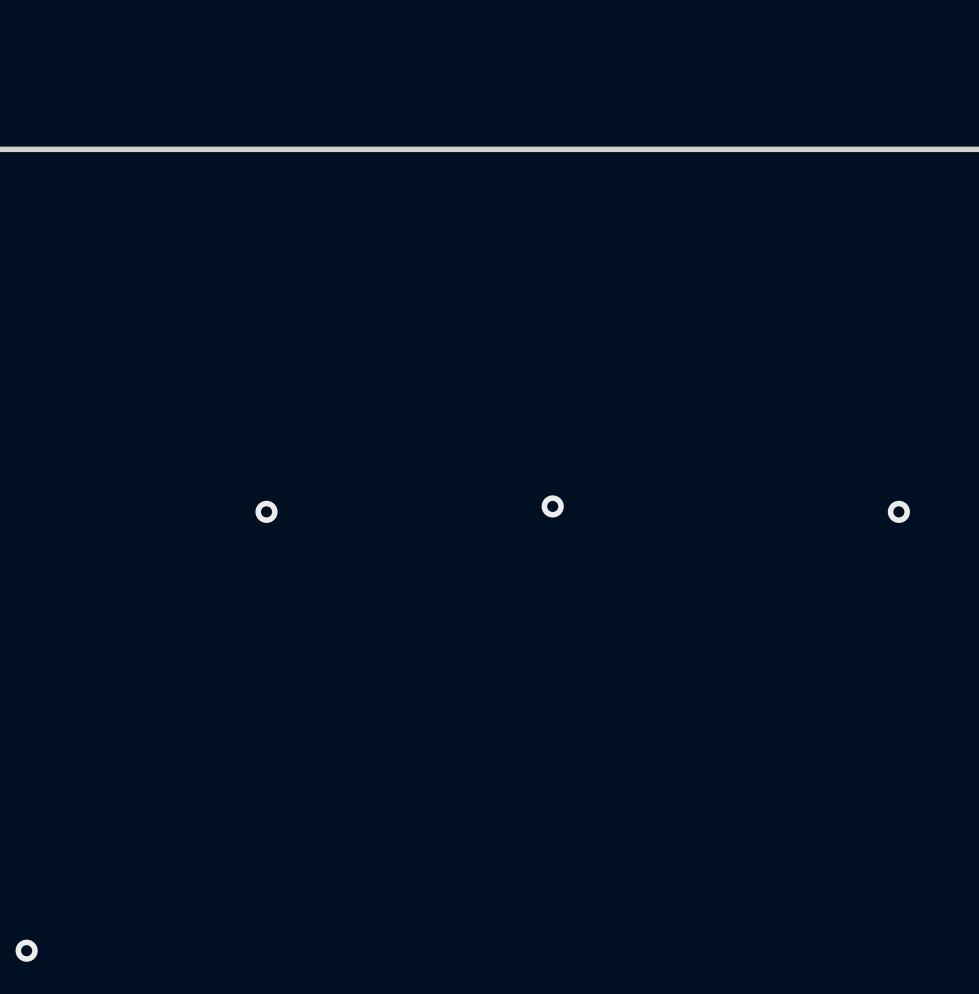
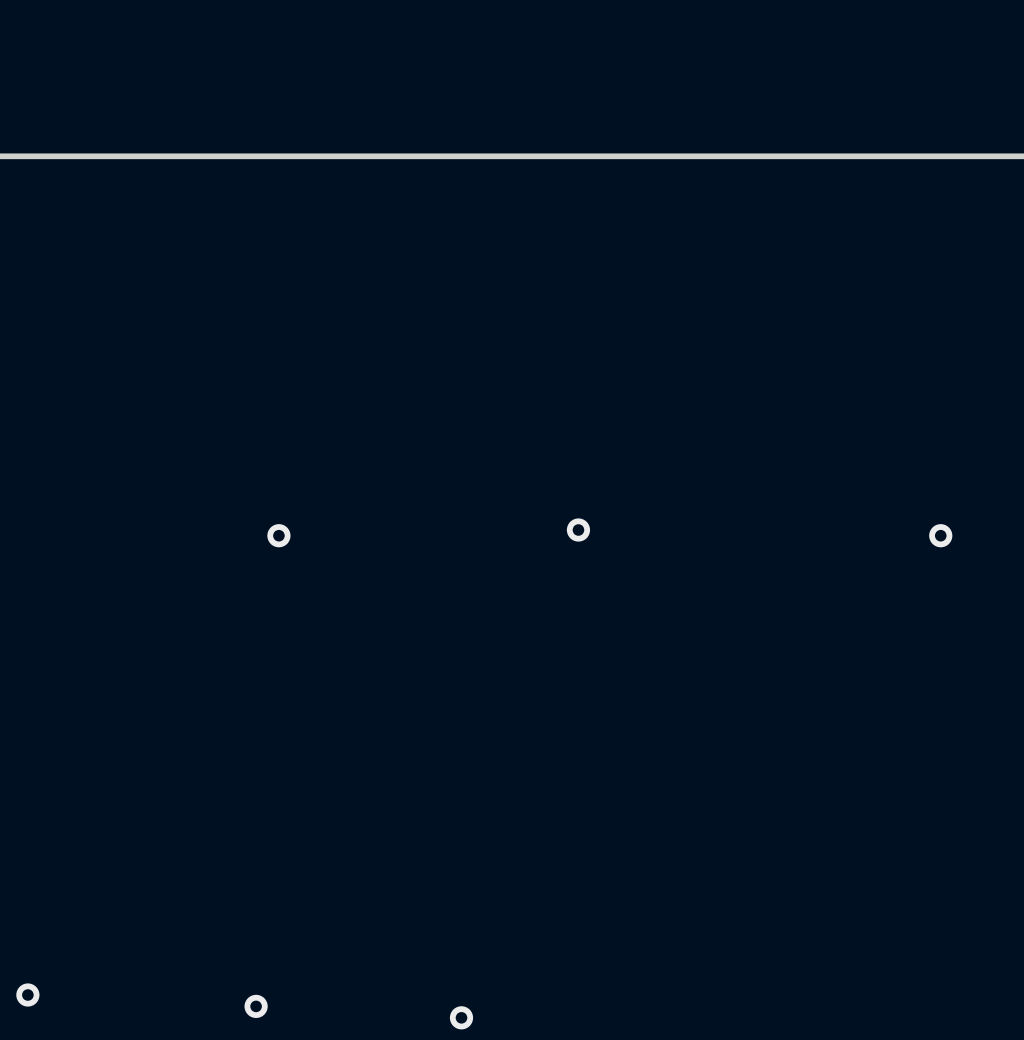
via: none -> (256, 1006)
via: none -> (461, 1017)

